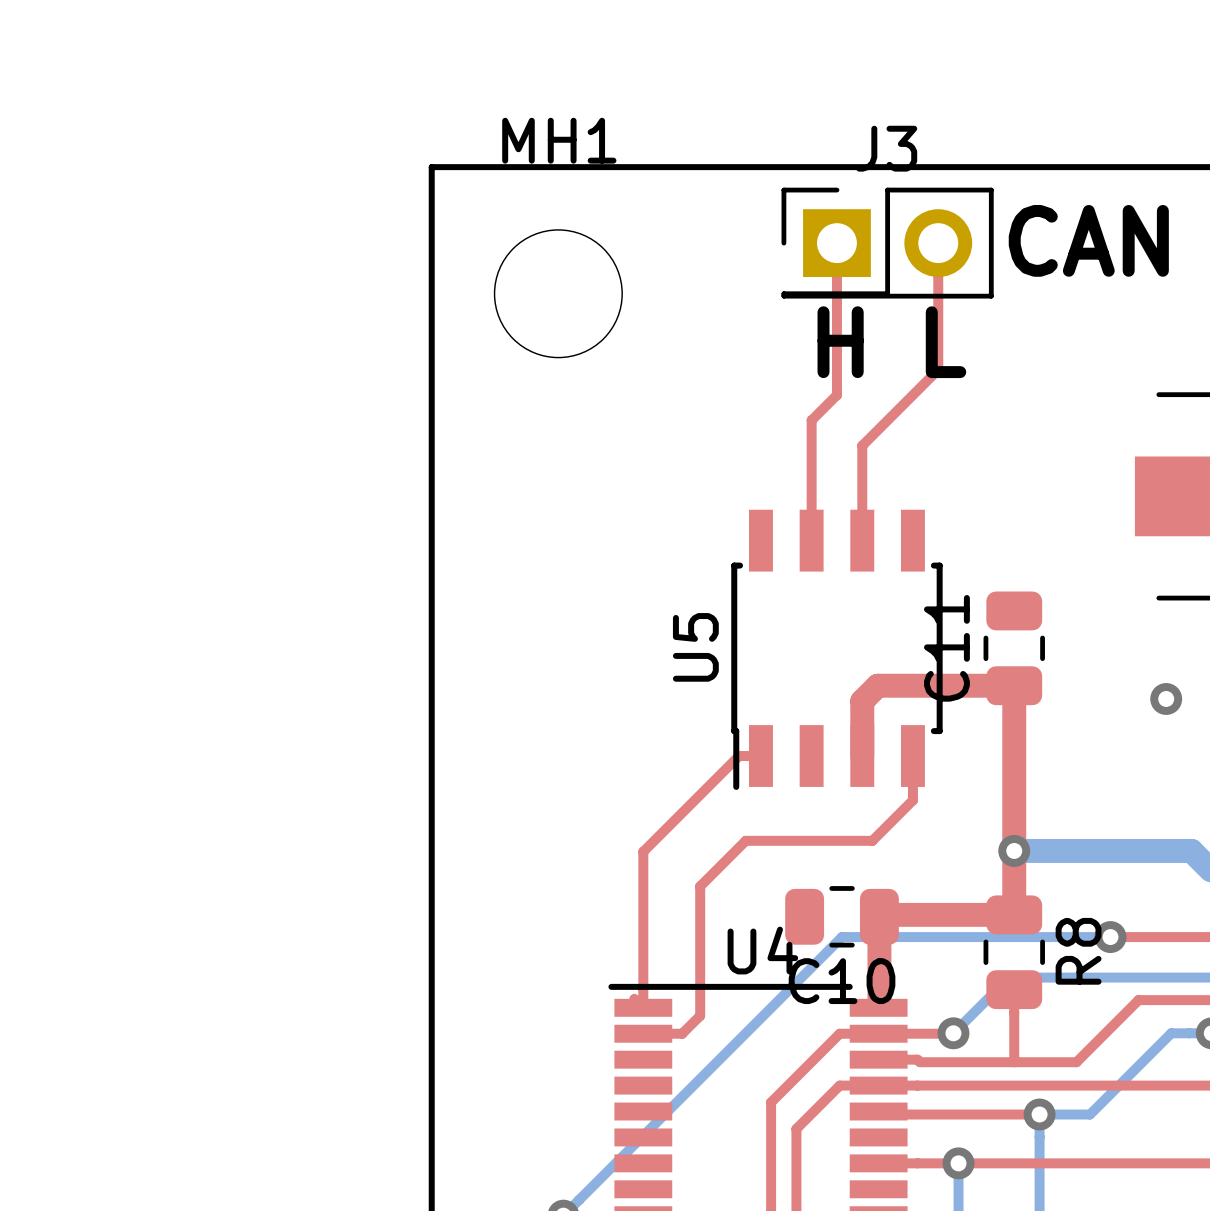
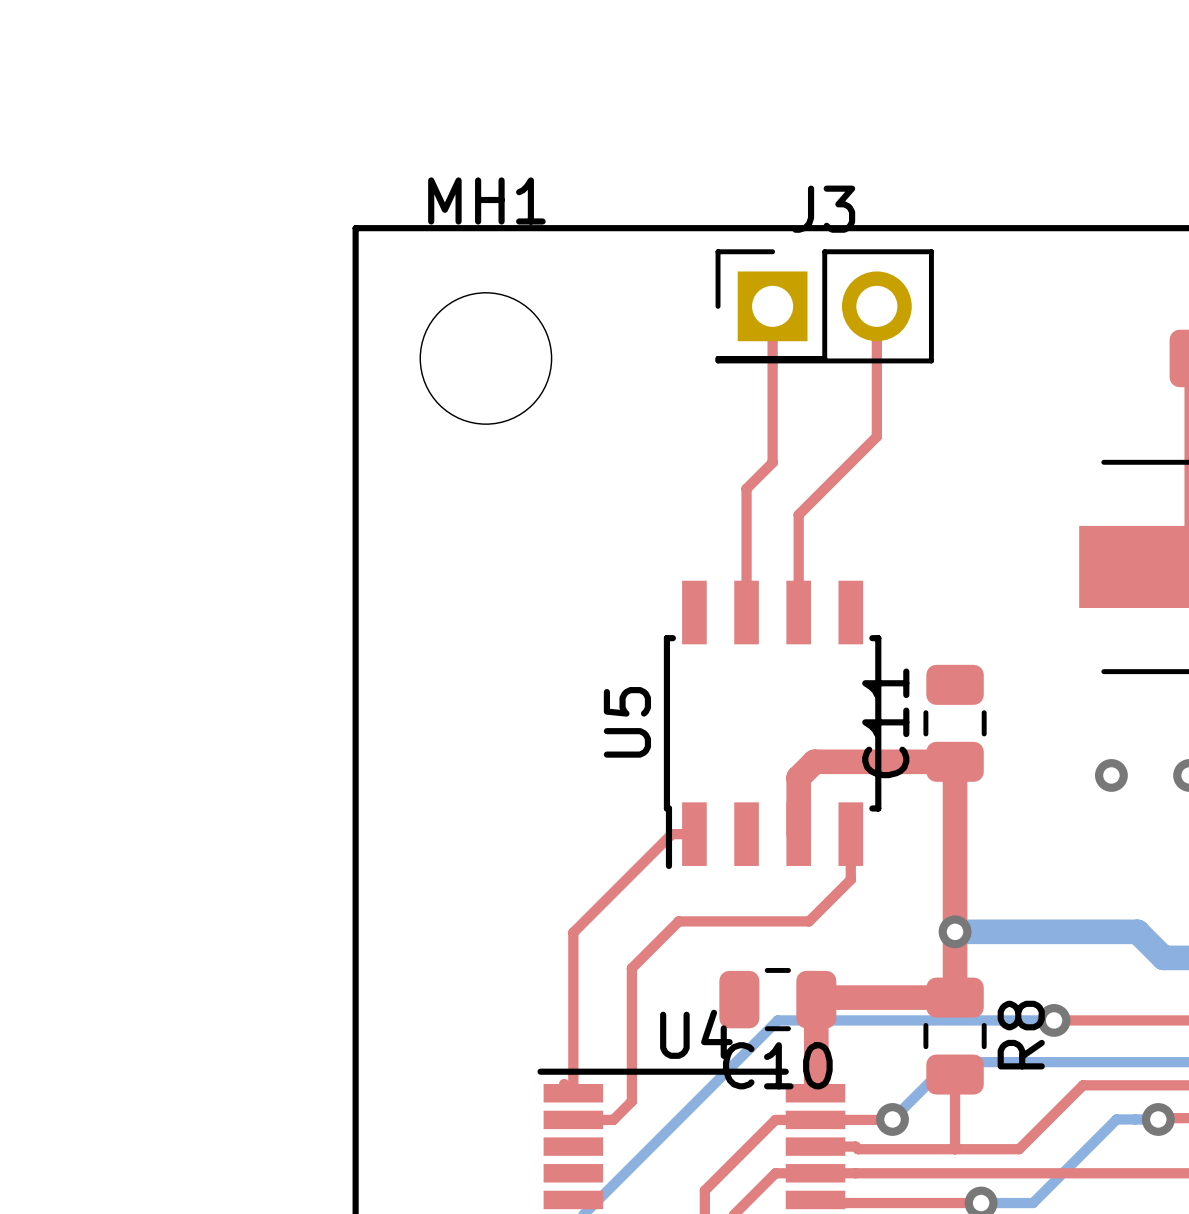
text: CAN (1088, 240) -> none
text: H L (891, 342) -> none

